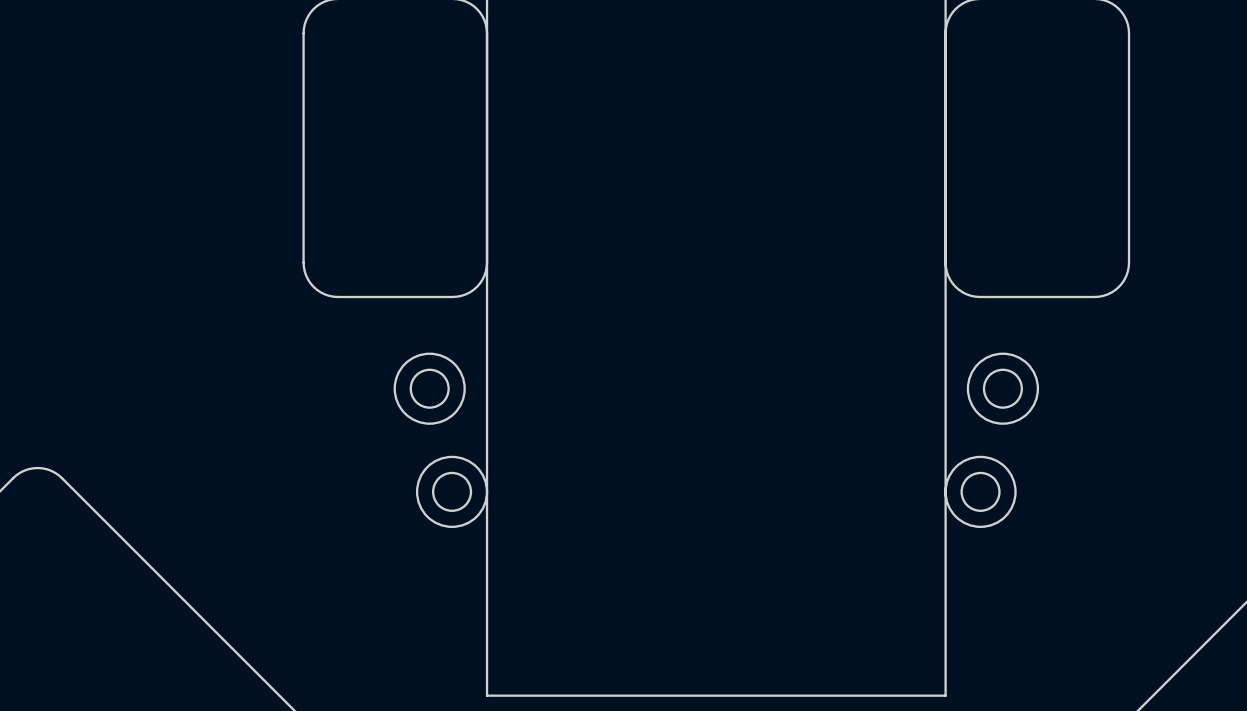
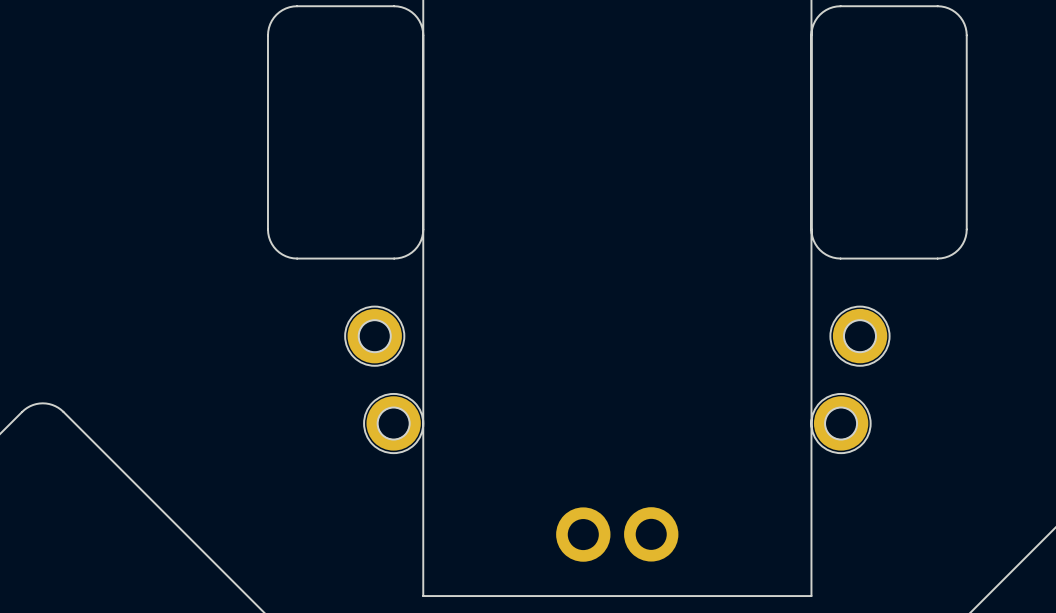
part: none -> (374, 336)
part: none -> (860, 336)
part: none -> (393, 423)
part: none -> (841, 423)
part: none -> (651, 534)
part: none -> (583, 534)

